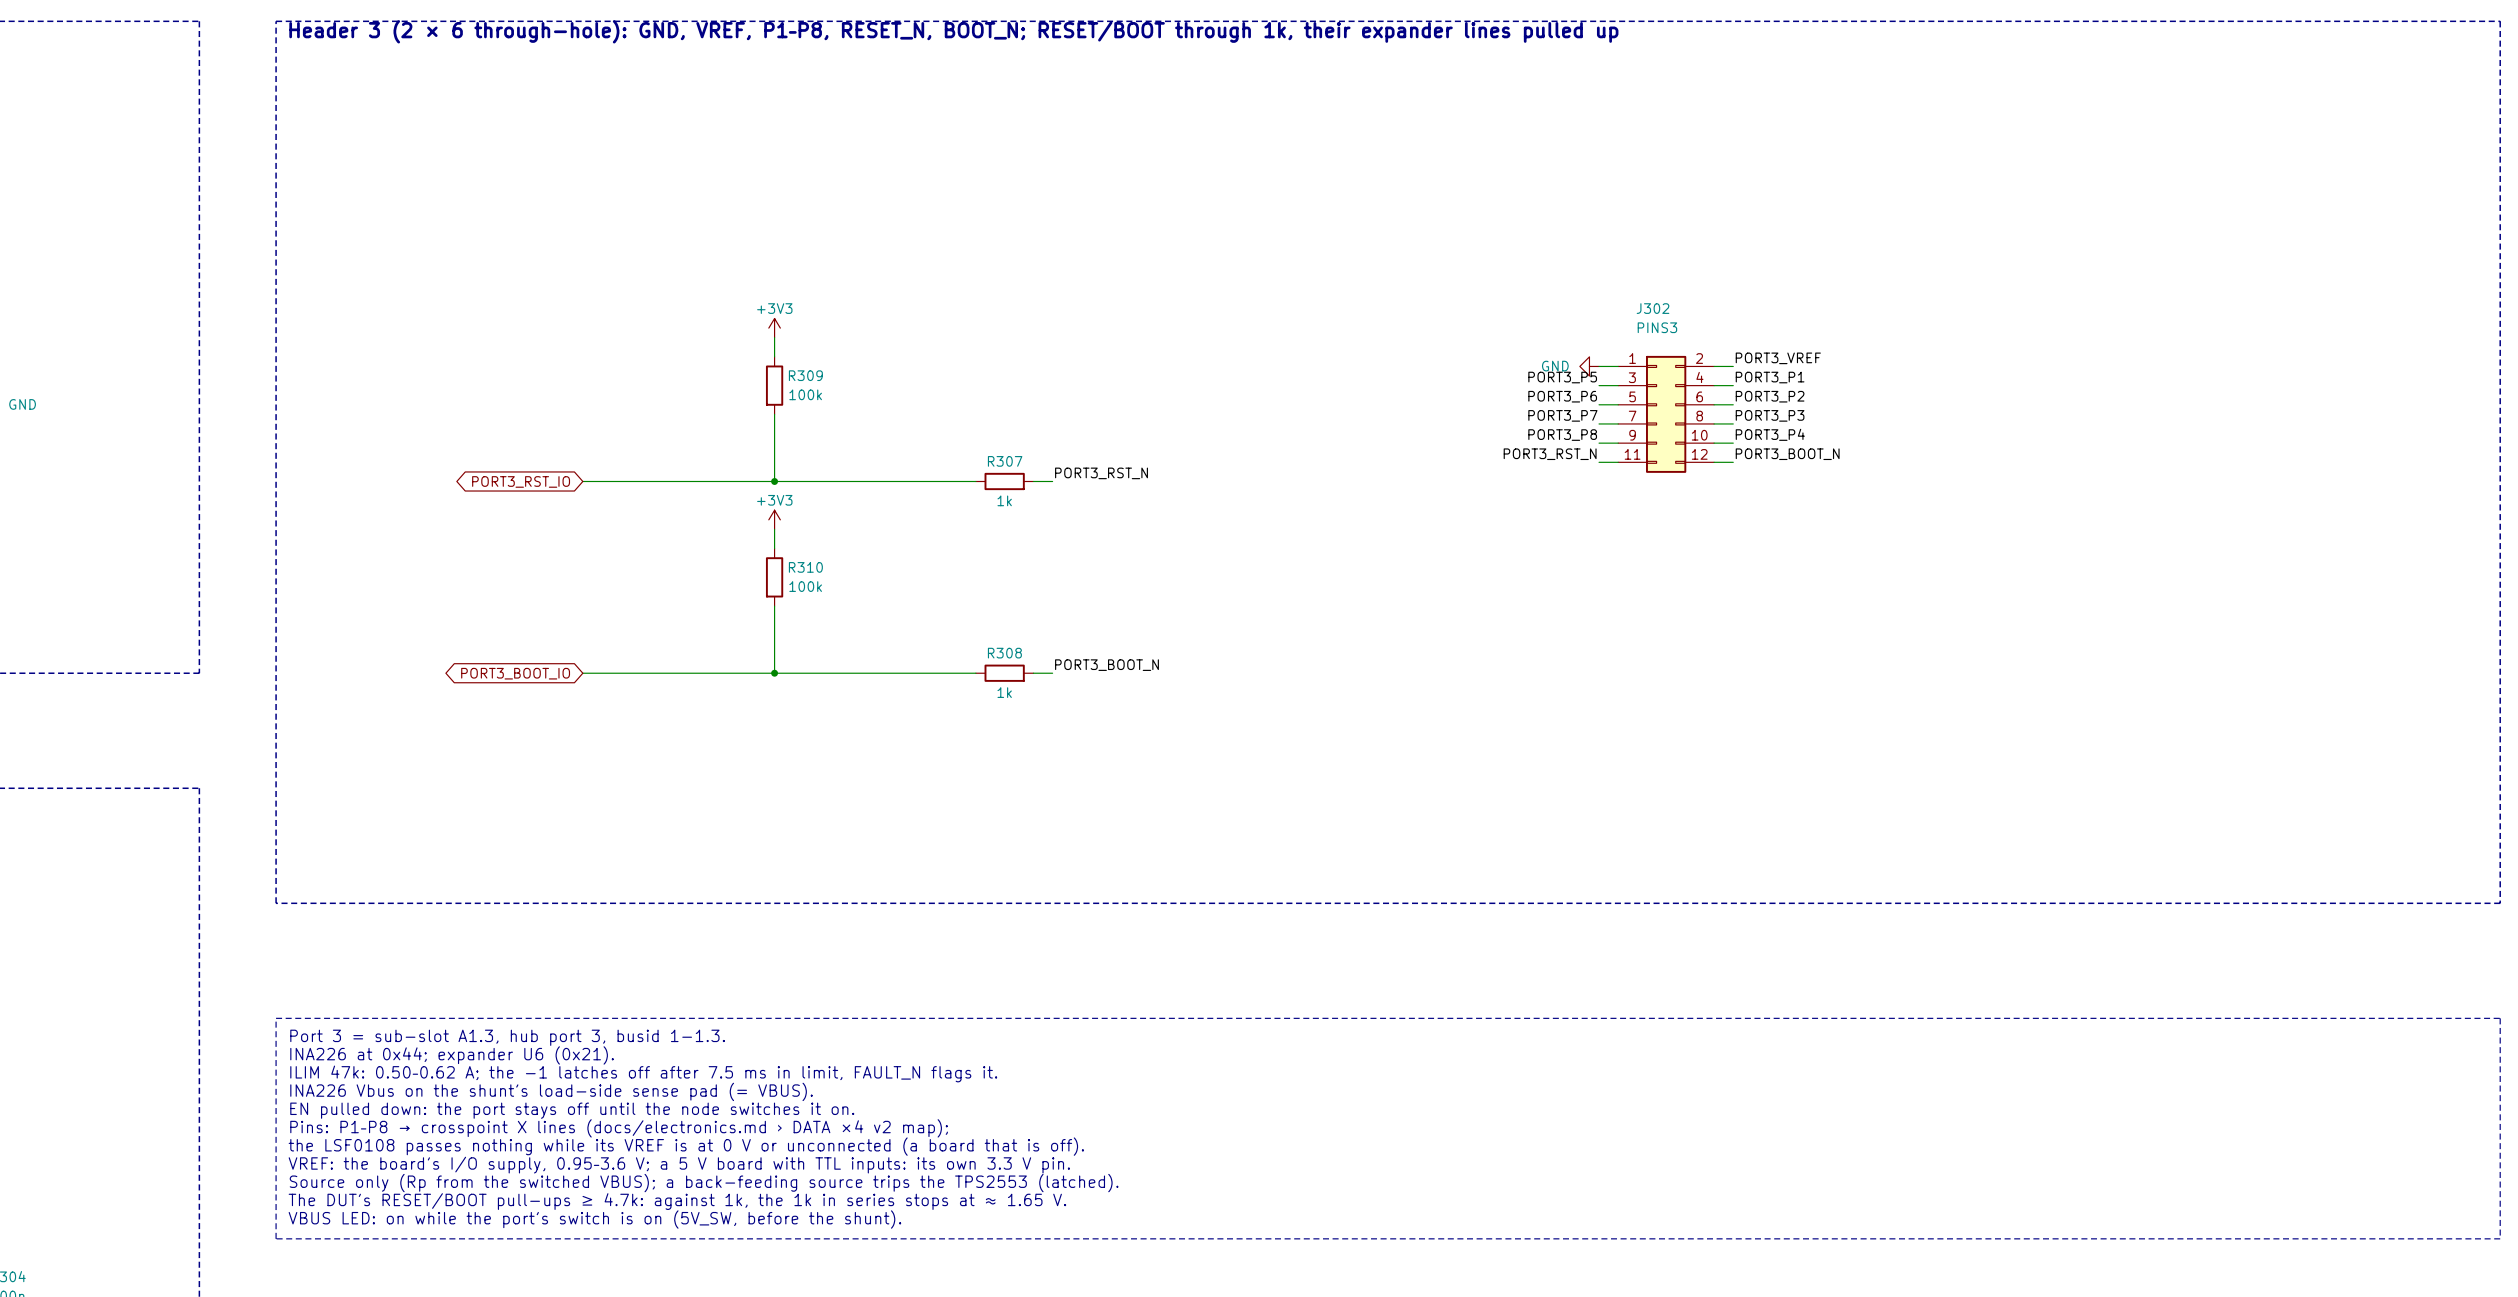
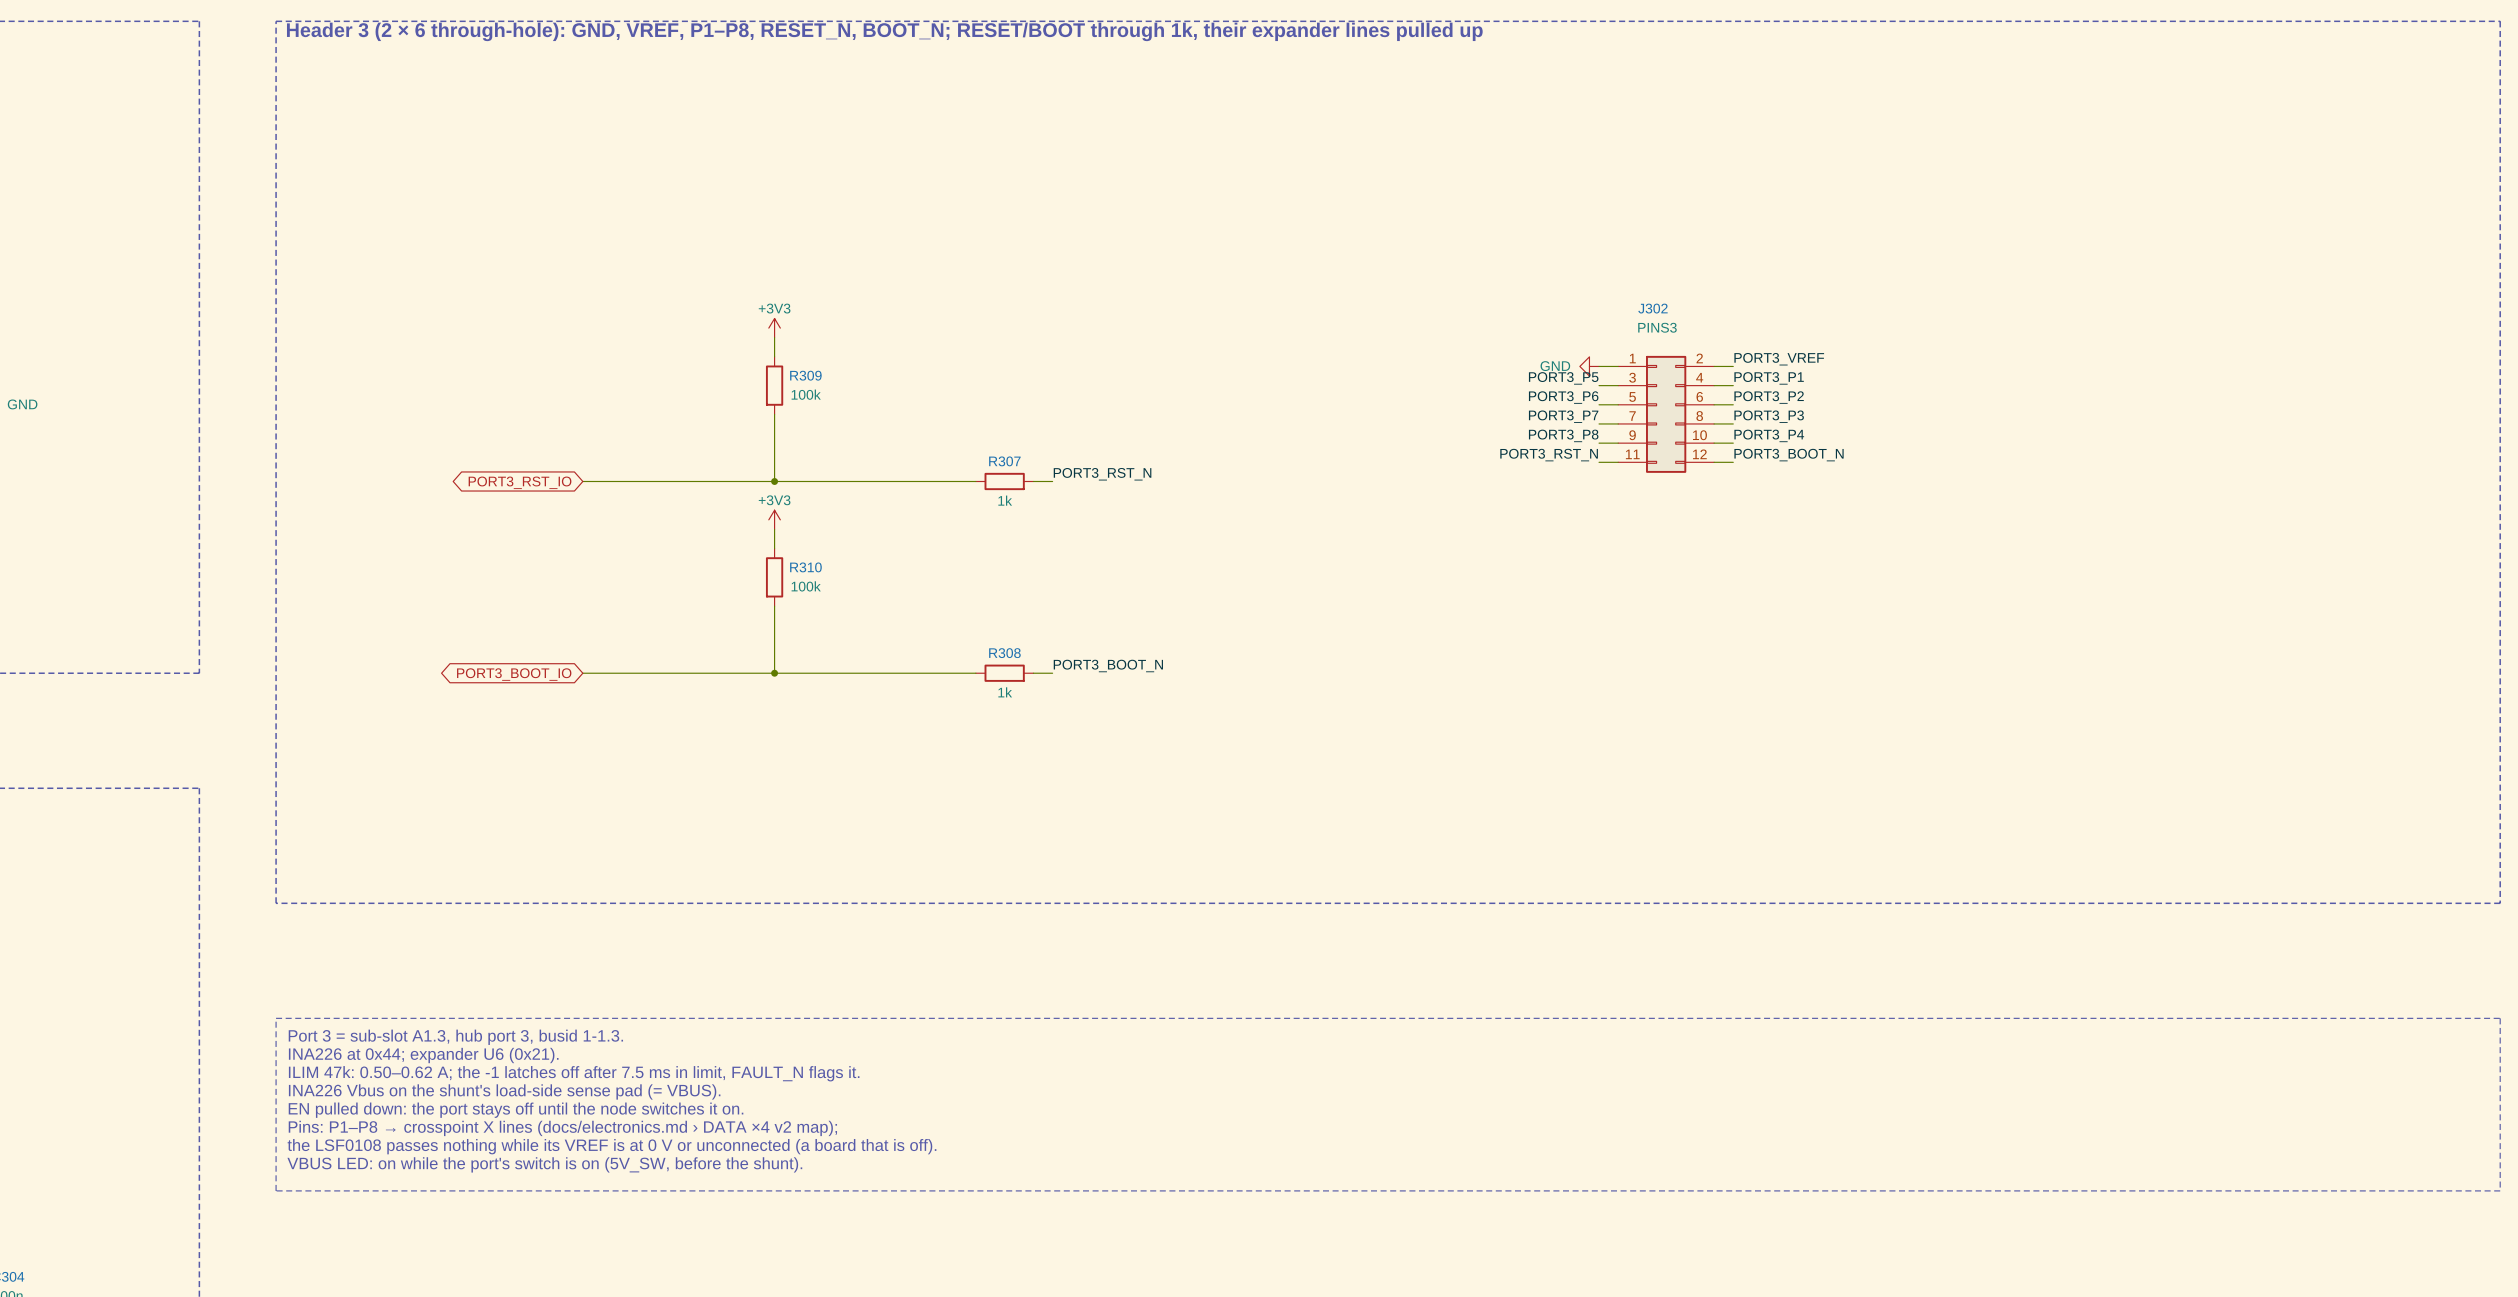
text: VREF: the board's I/O supply, 0.95–3.6 V; a 5 V board with TTL inputs: its own 3.3 V pin. (679, 1165) -> VBUS LED: on while the port's switch is on (5V_SW, before the shunt). (544, 1164)
text: Source only (Rp from the switched VBUS); a back-feeding source trips the TPS2553 (latched). (704, 1183) -> none
line: (276, 1190) (276, 1238) (2500, 1238) (2500, 1190) -> (276, 1190) (2500, 1190)
text: The DUT's RESET/BOOT pull-ups ≥ 4.7k: against 1k, the 1k in series stops at ≈ 1.65 V. (677, 1201) -> none
text: VBUS LED: on while the port's switch is on (5V_SW, before the shunt). (594, 1219) -> none

